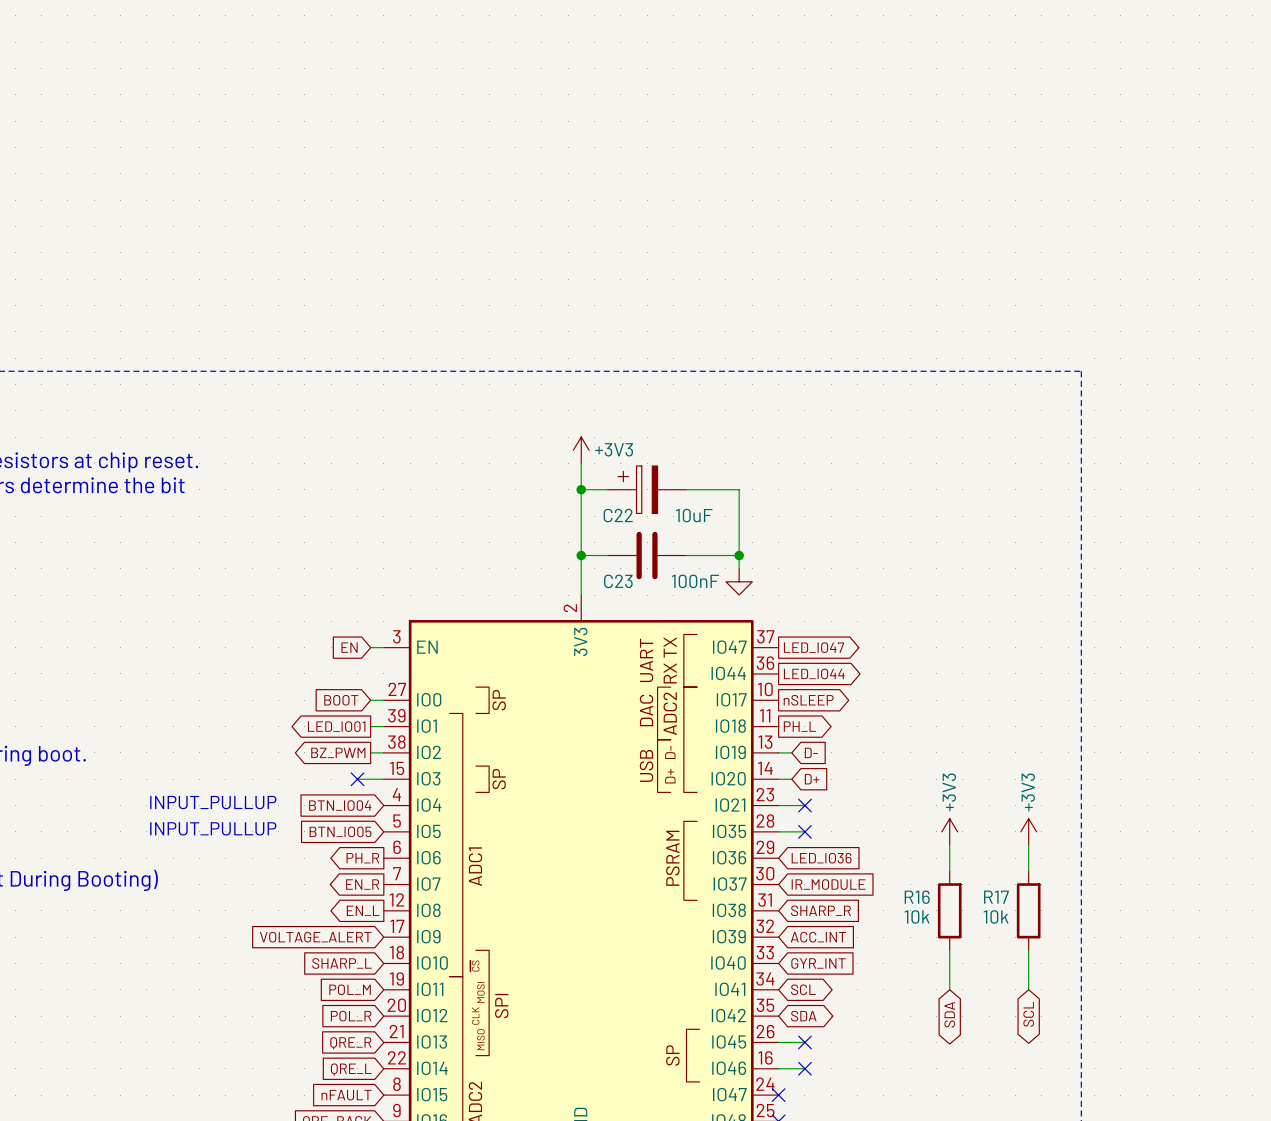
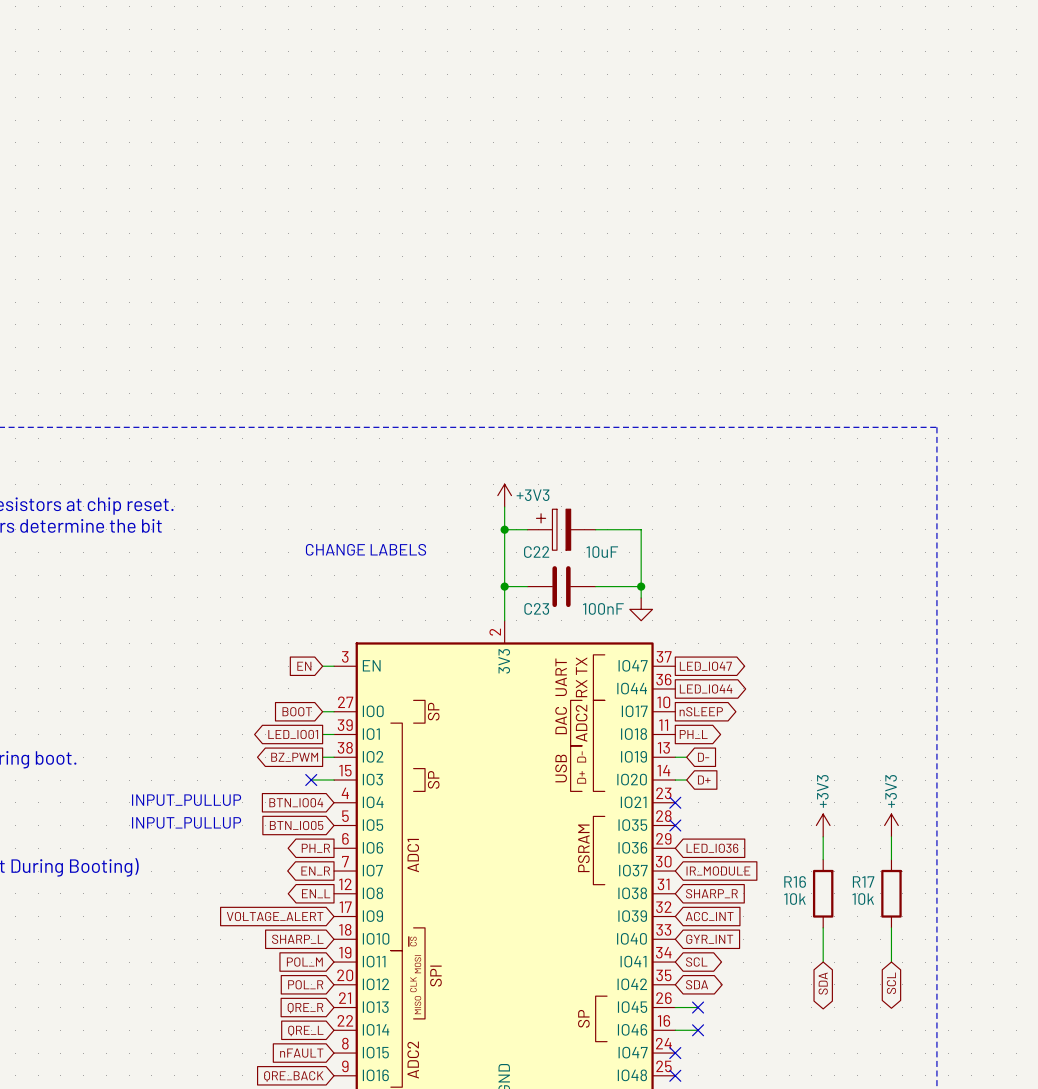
text: none -> CHANGE LABELS (366, 549)
wire: (778, 805) (804, 805) -> none
no-connect mark: none -> (675, 802)
no-connect mark: (804, 805) -> none
wire: (778, 831) (804, 831) -> none
no-connect mark: none -> (675, 825)
no-connect mark: (804, 831) -> none

